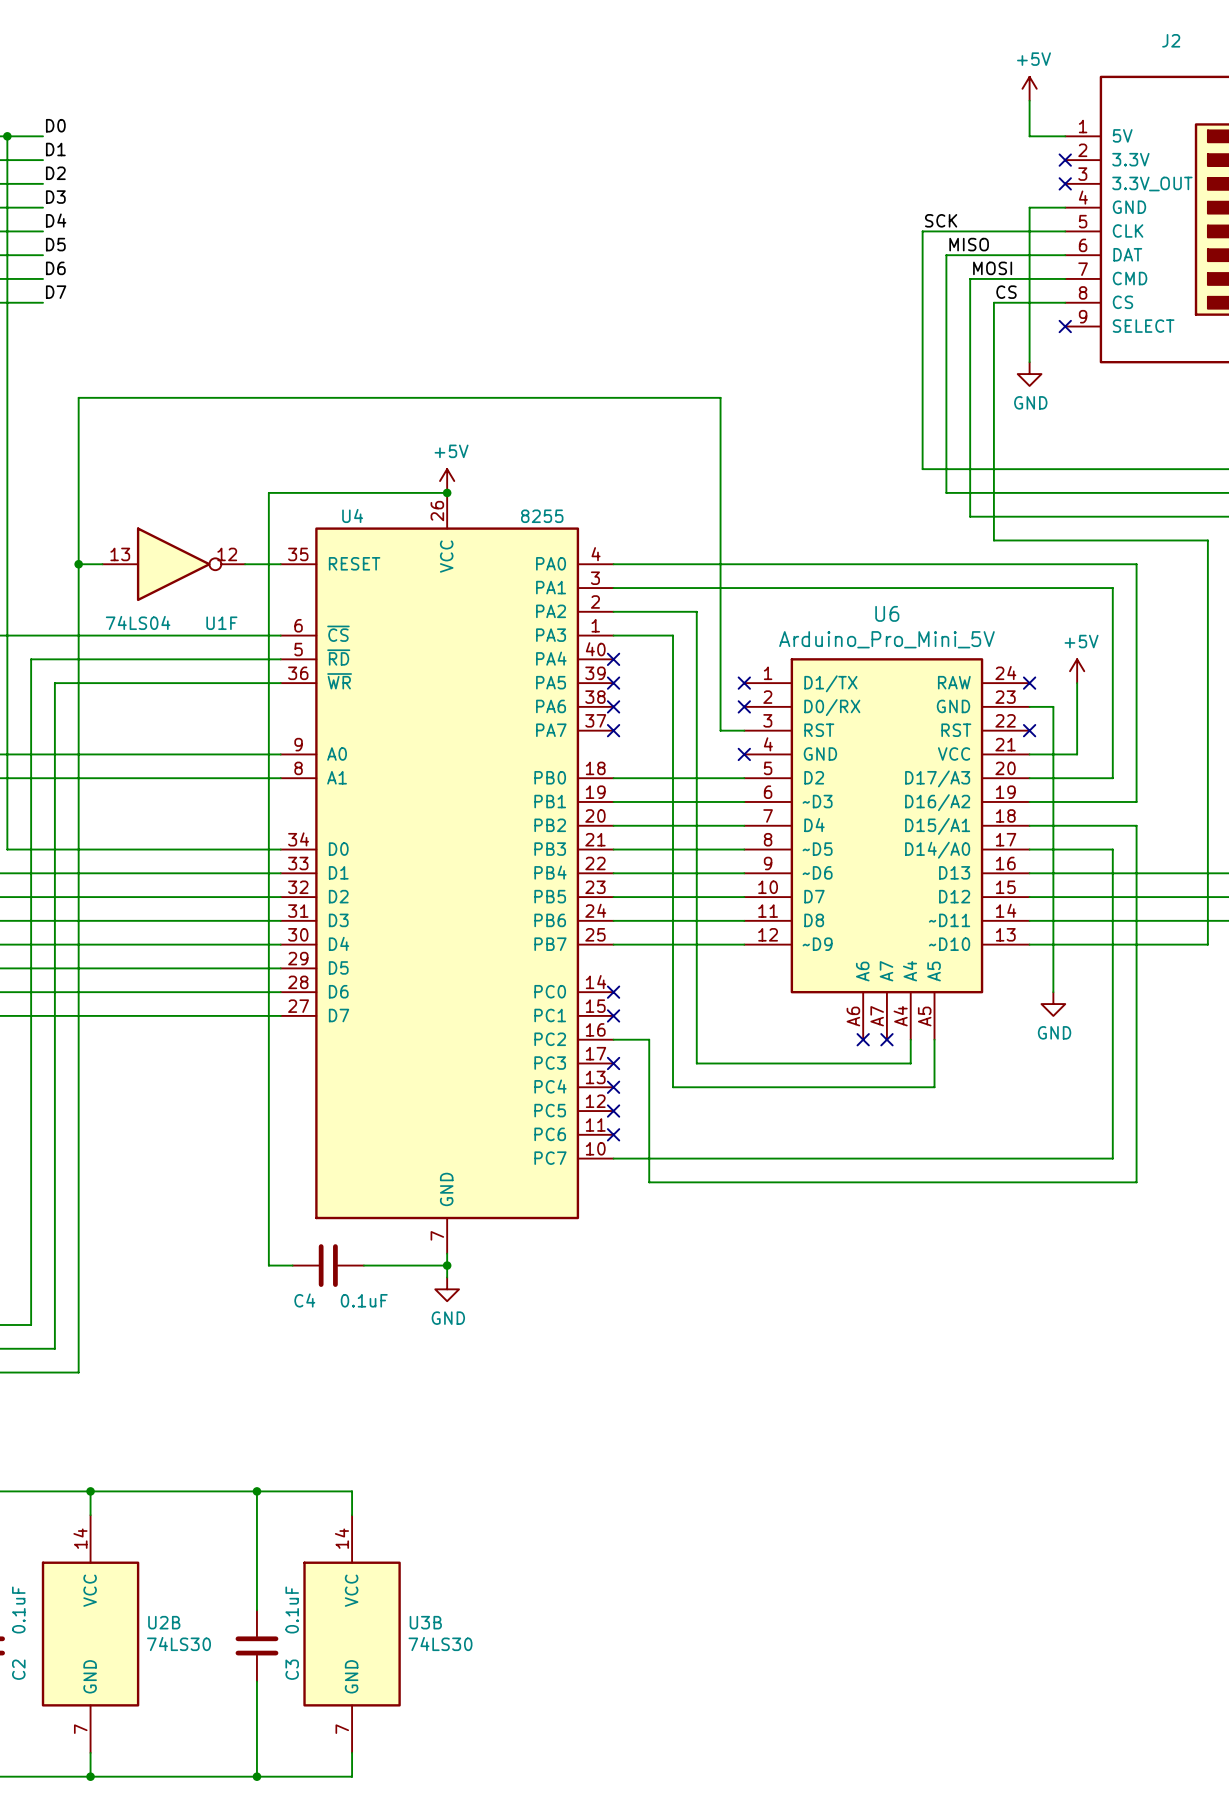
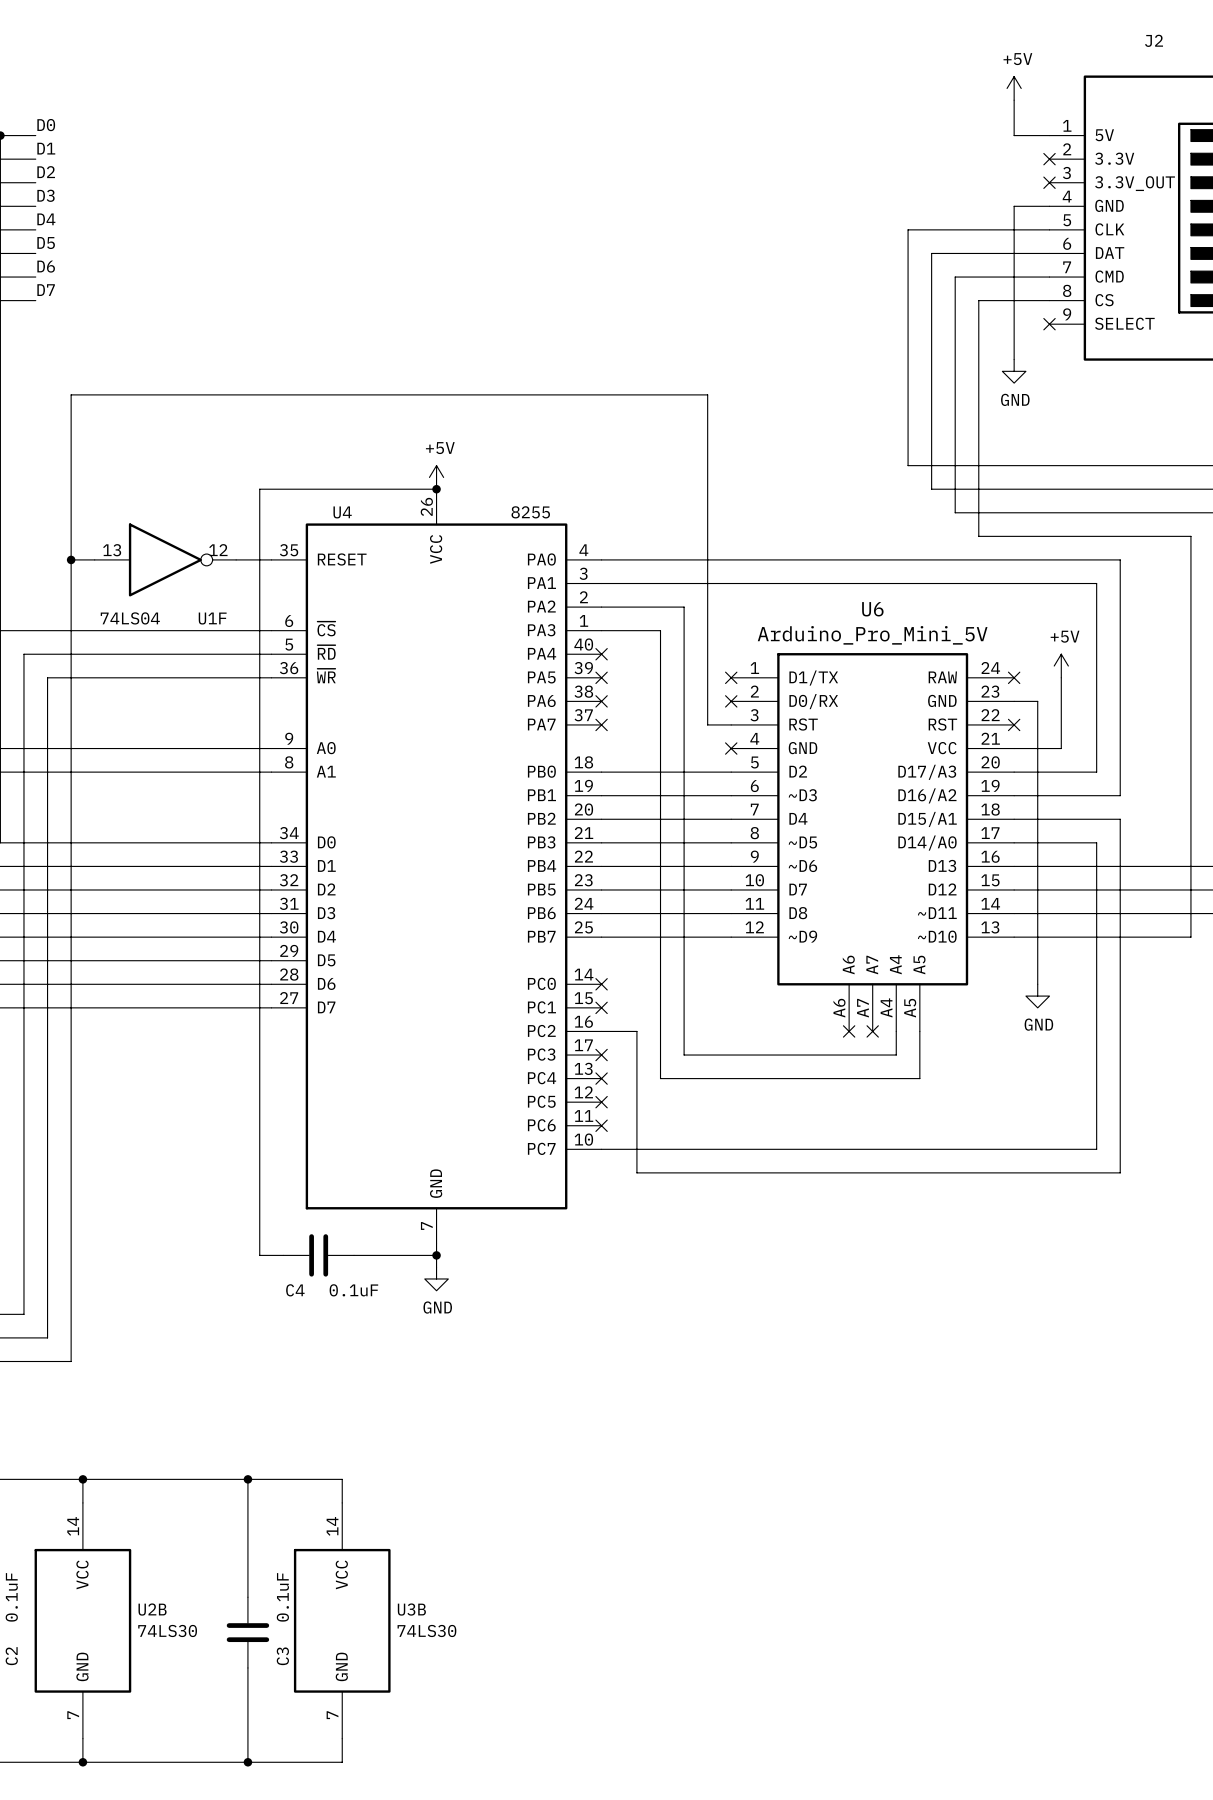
label: SCK (941, 220) -> none
label: MISO (969, 244) -> none
label: MOSI (992, 268) -> none
label: CS (1006, 292) -> none

